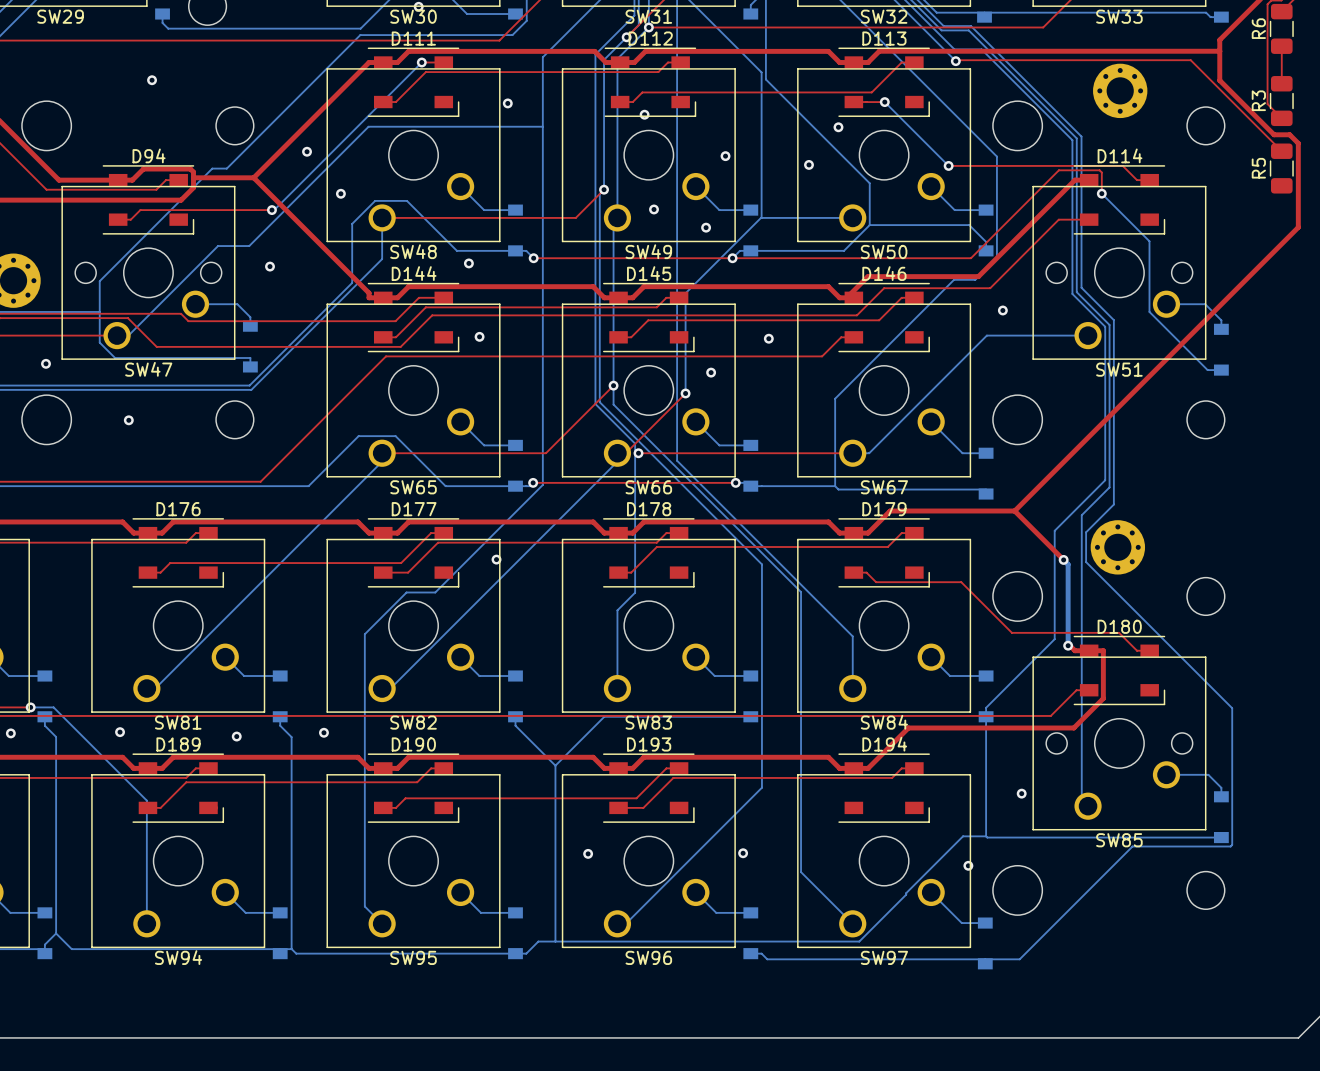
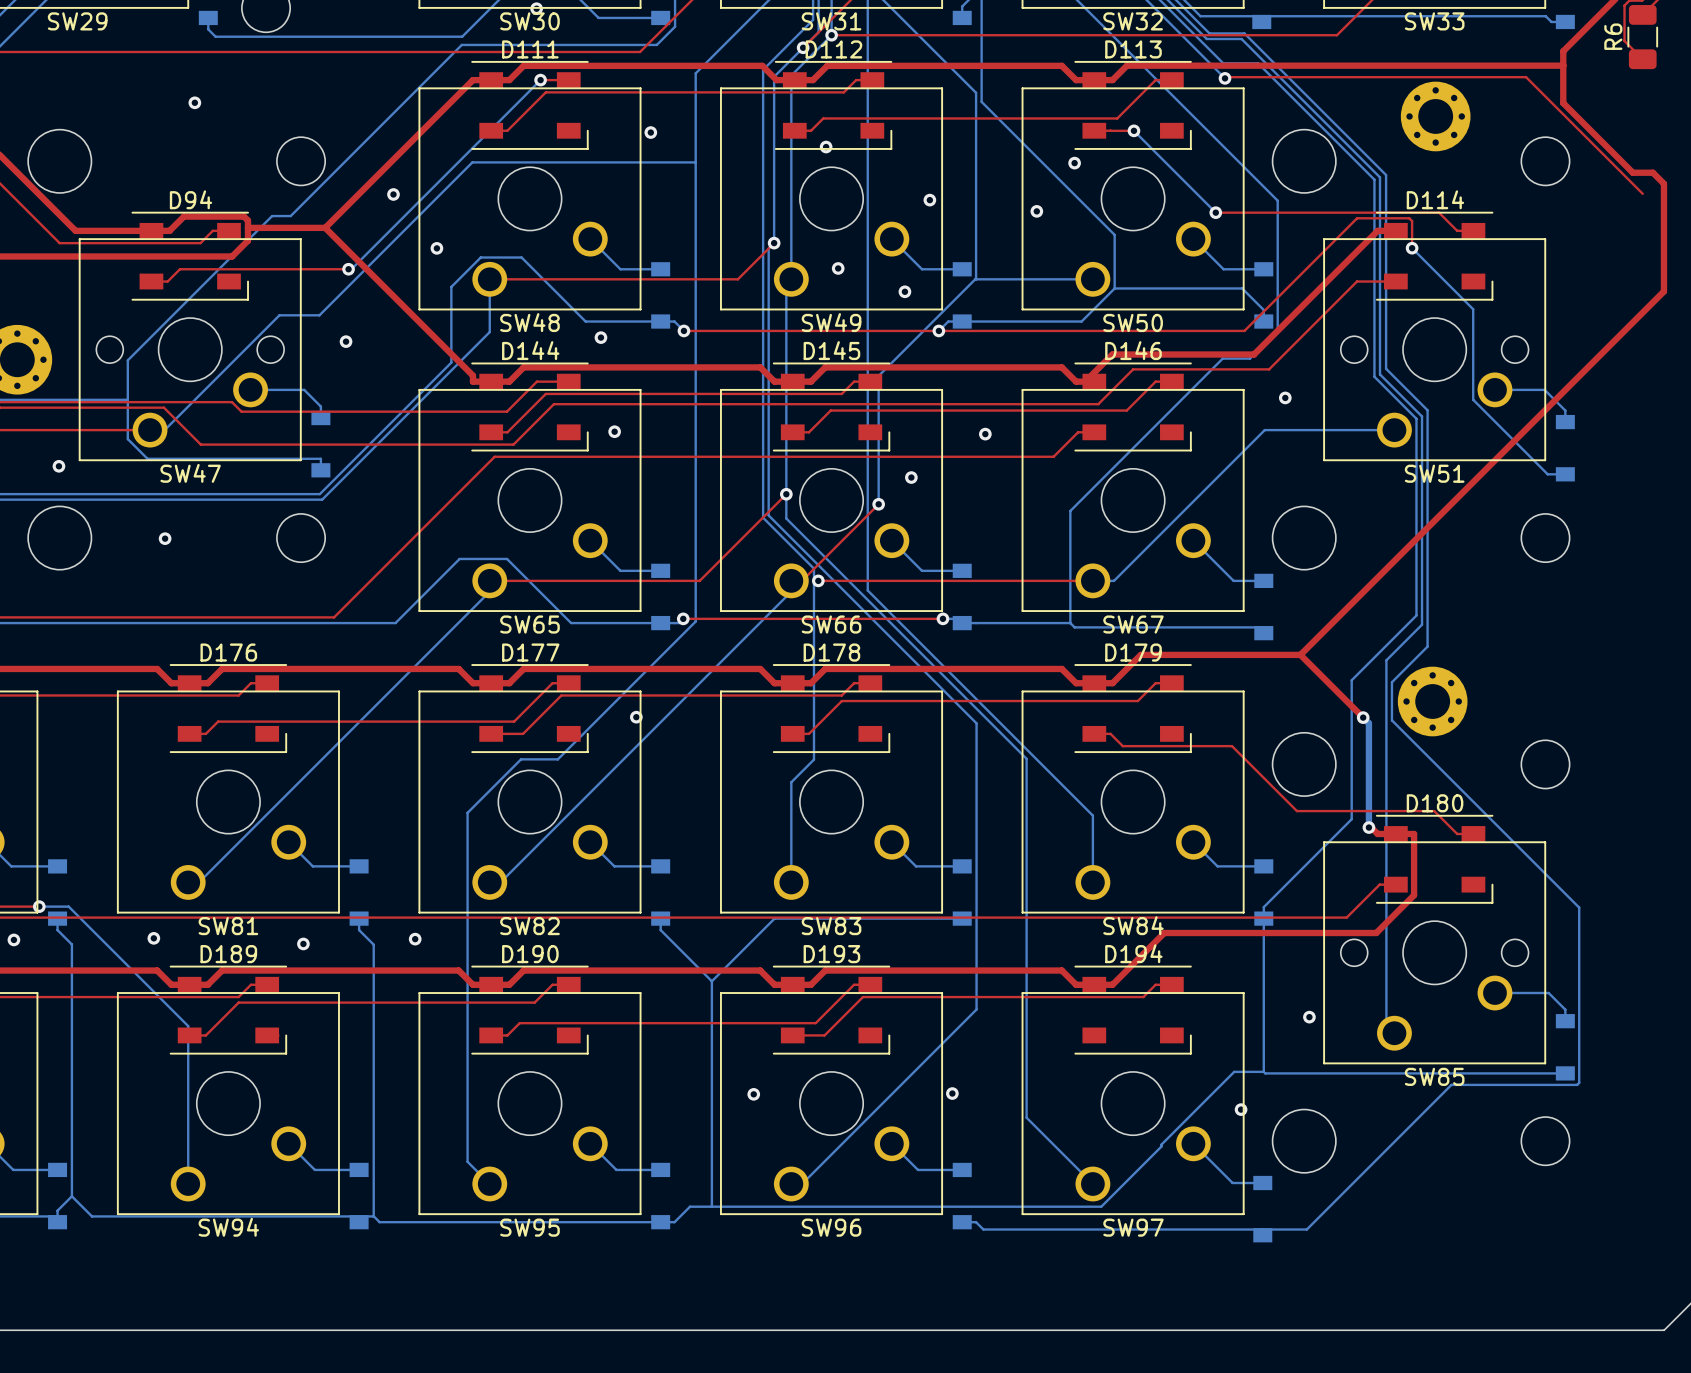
top track: (1267, 32) (1267, 104) (1281, 118) -> none
top track: (1281, 46) (1281, 83) -> (1642, 59) (1624, 41)
R3: (1281, 101) -> none
R5: (1281, 168) -> none

